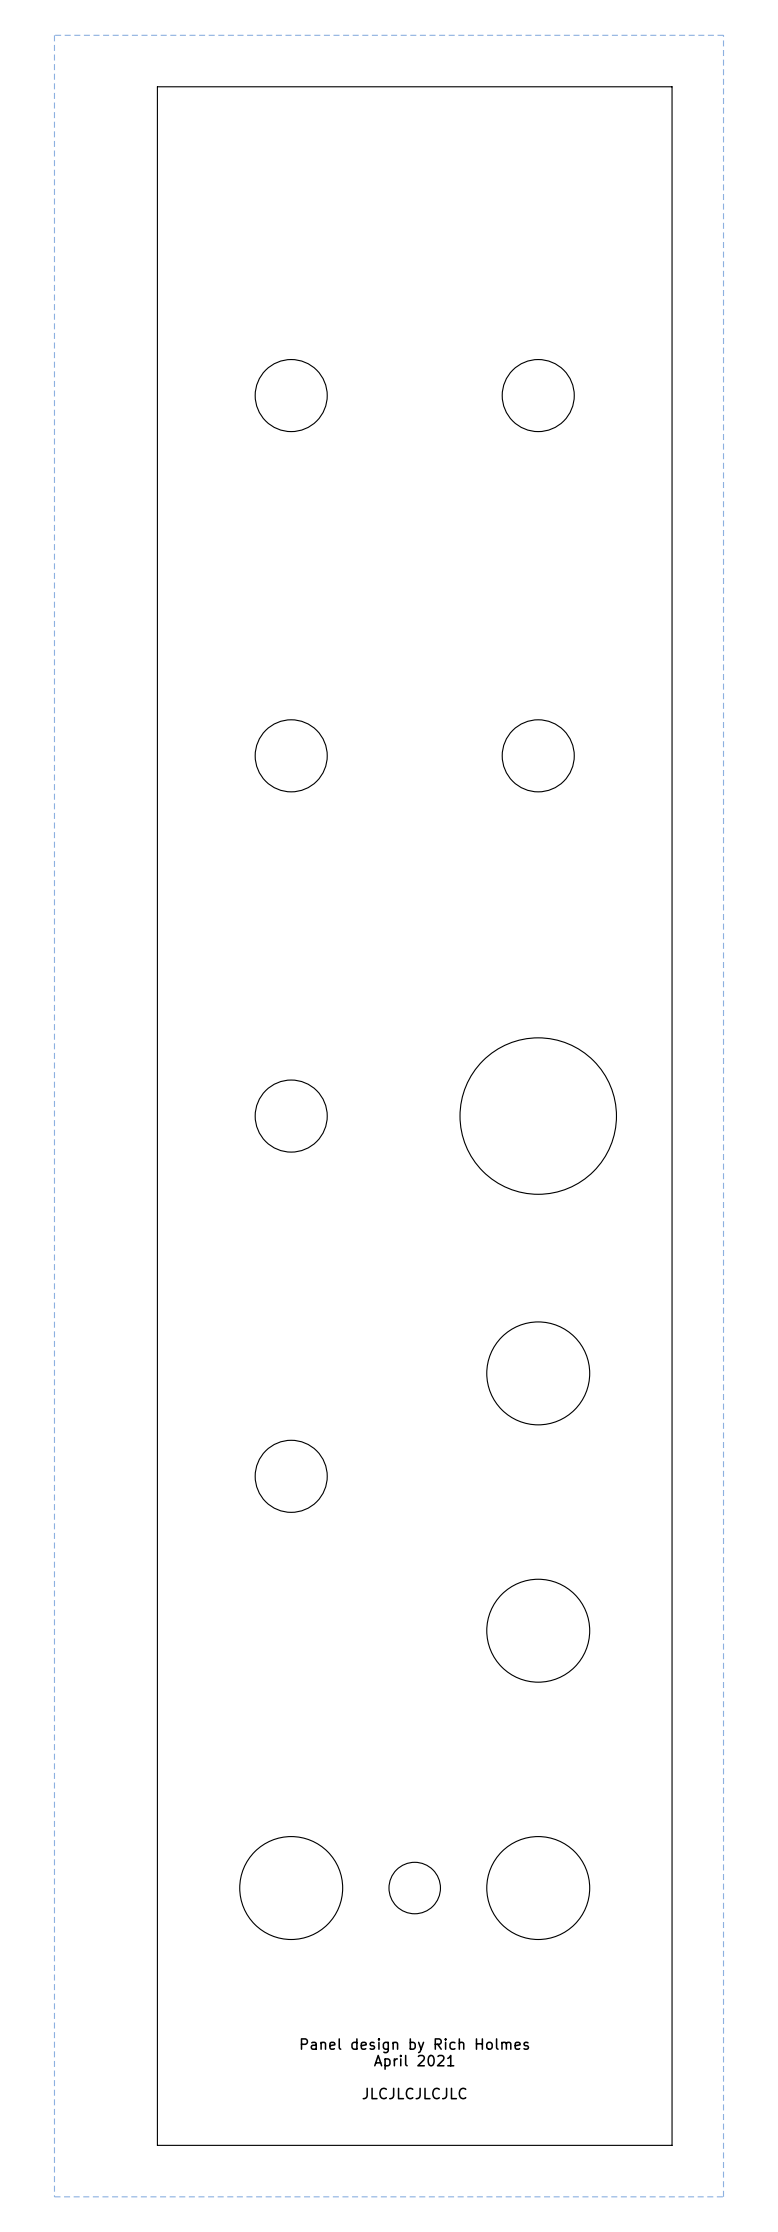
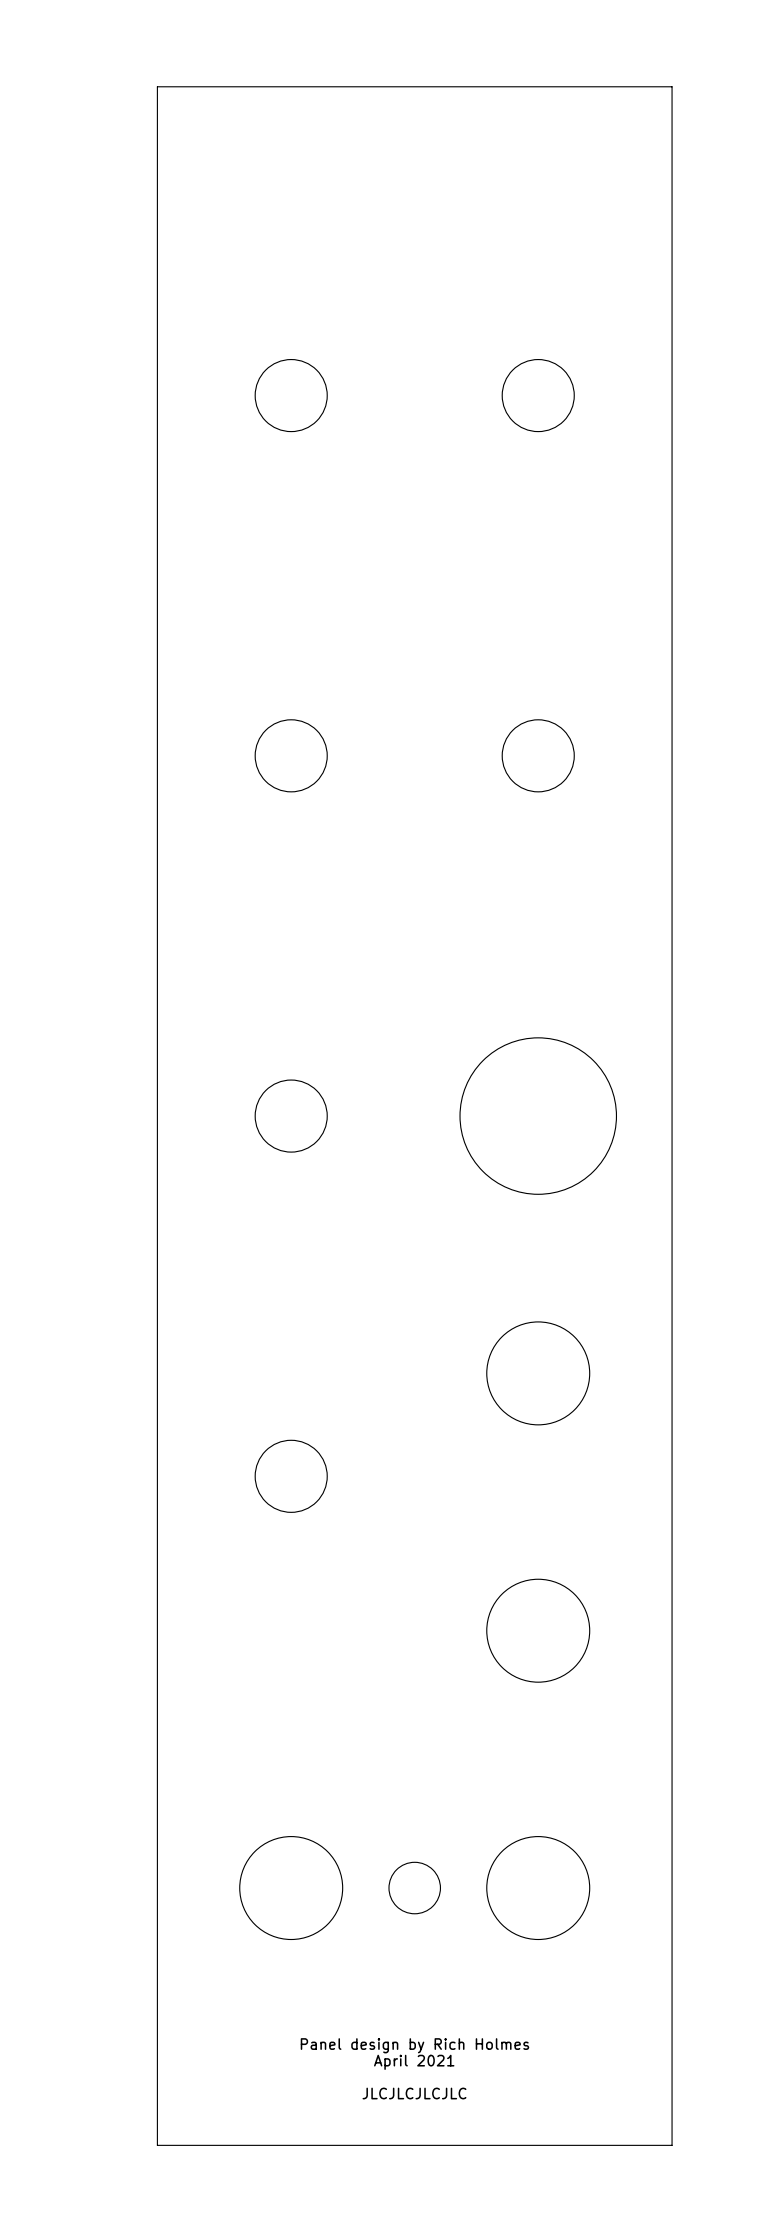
zone outline: (723, 35) (723, 2196) (54, 2196) (54, 35) (723, 35) -> none

